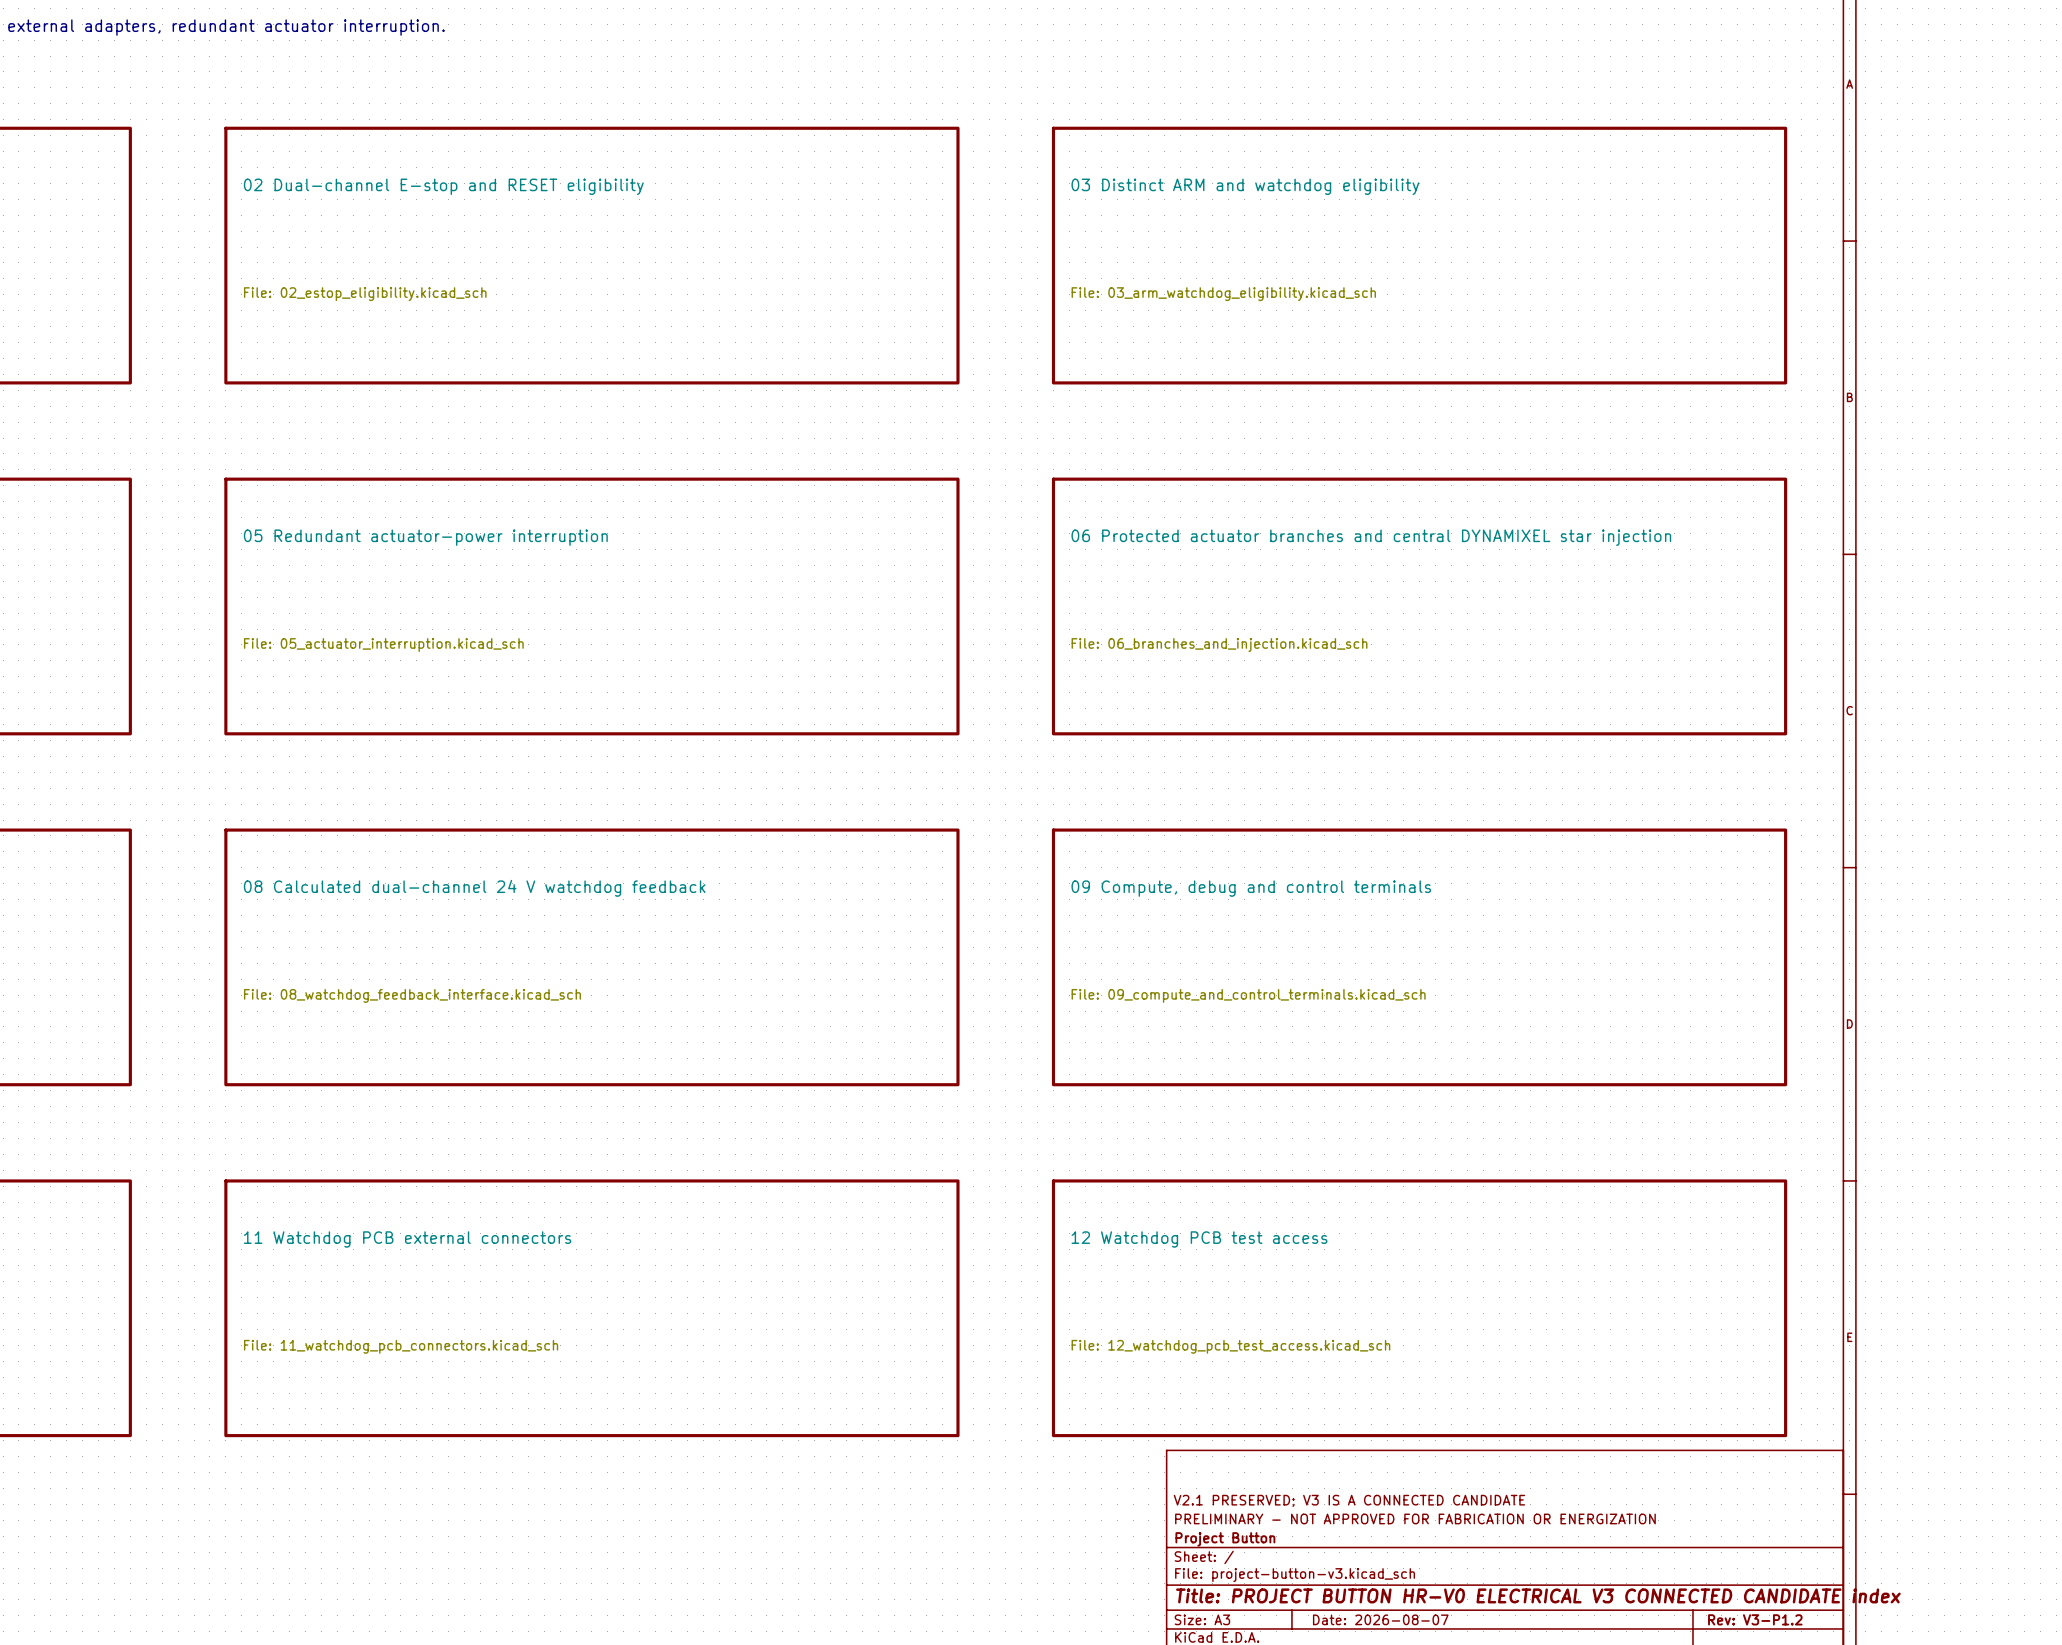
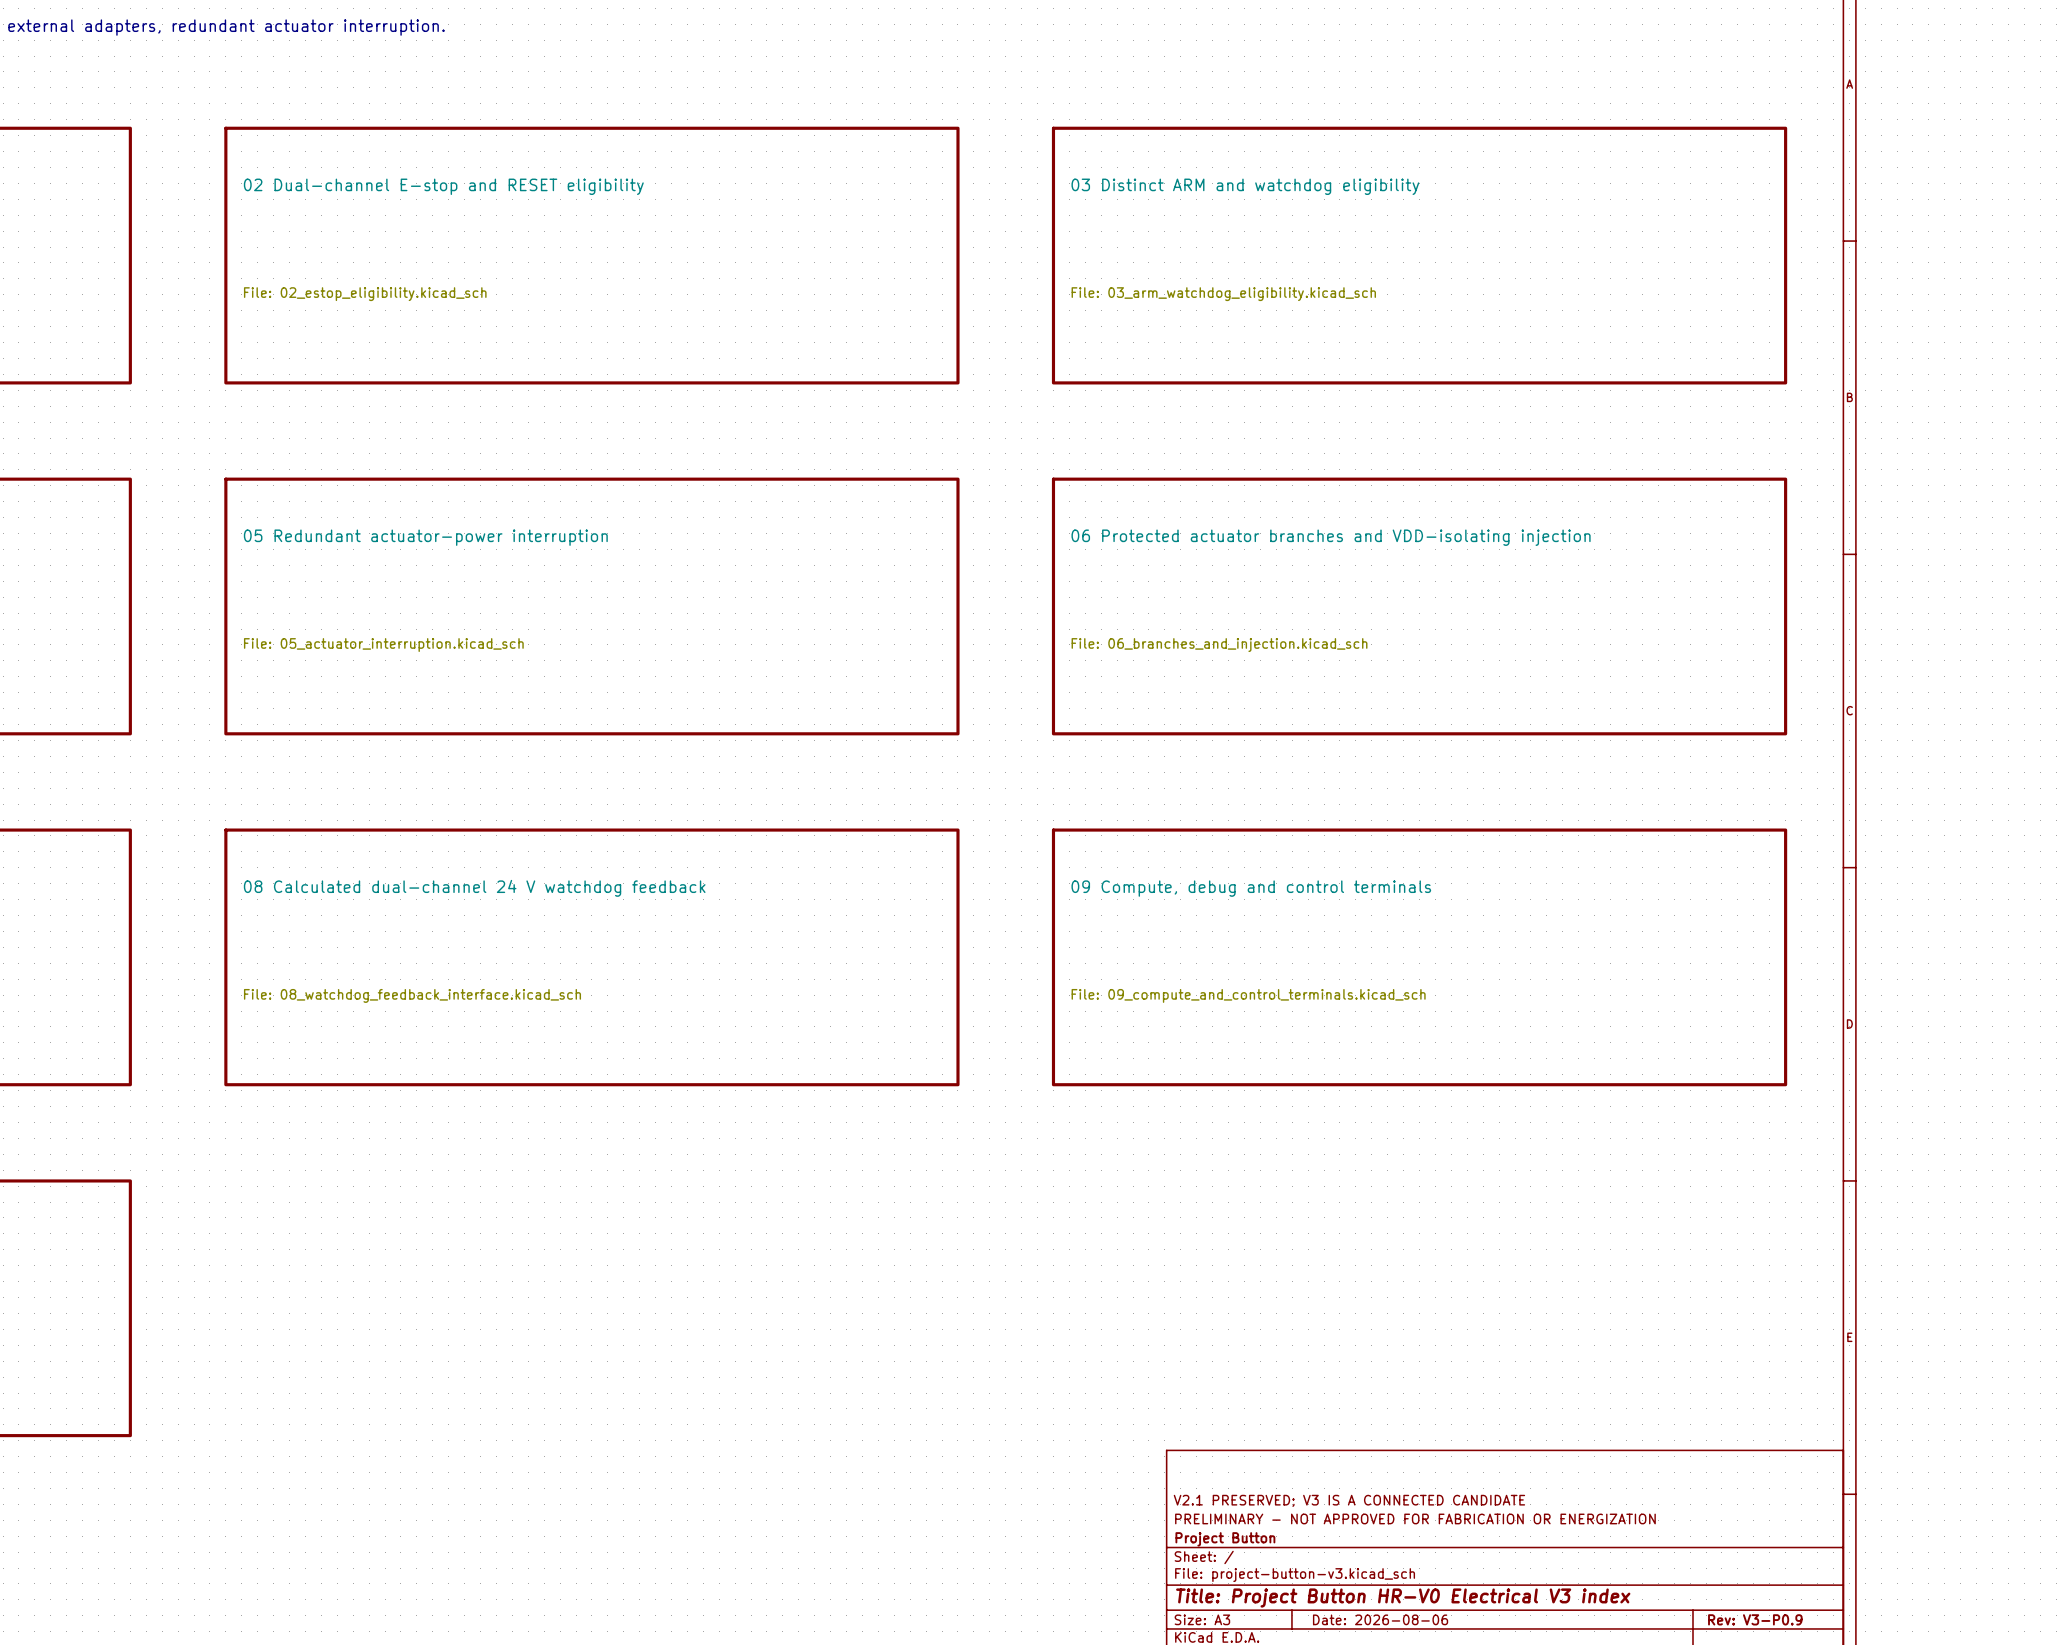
sheet 06 Protected actuator branches and central DYNAMIXEL star injection name: 06 Protected actuator branches and central DYNAMIXEL star injection (1371, 537) -> 06 Protected actuator branches and VDD-isolating injection (1331, 537)
sheet 11 Watchdog PCB external connectors: File: 11_watchdog_pcb_connectors.kicad_sch (591, 1308) -> none
sheet 12 Watchdog PCB test access: File: 12_watchdog_pcb_test_access.kicad_sch (1419, 1308) -> none
title block: Title: PROJECT BUTTON HR-V0 ELECTRICAL V3 CONNECTED CANDIDATE index (1538, 1595) -> Title: Project Button HR-V0 Electrical V3 index (1403, 1598)
title block: Date: 2026-08-07 (1380, 1619) -> Date: 2026-08-06 (1380, 1619)
title block: Rev: V3-P1.2 (1755, 1619) -> Rev: V3-P0.9 (1755, 1619)

